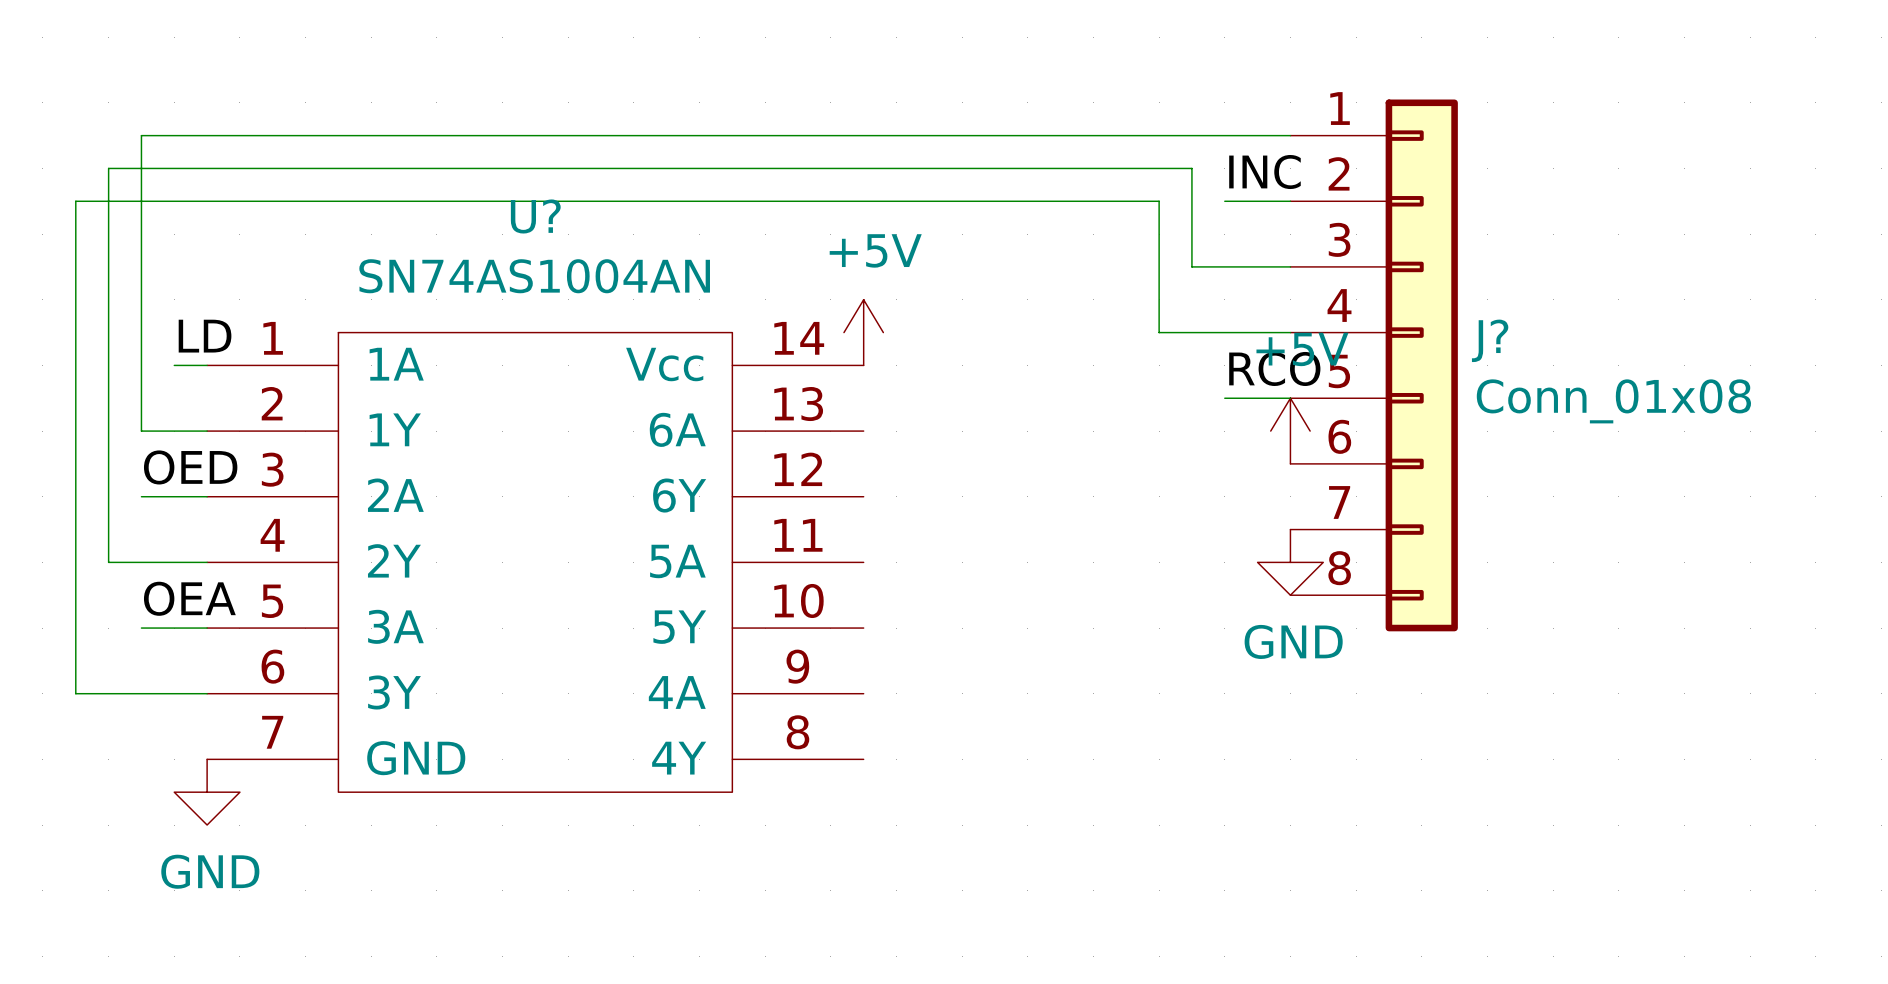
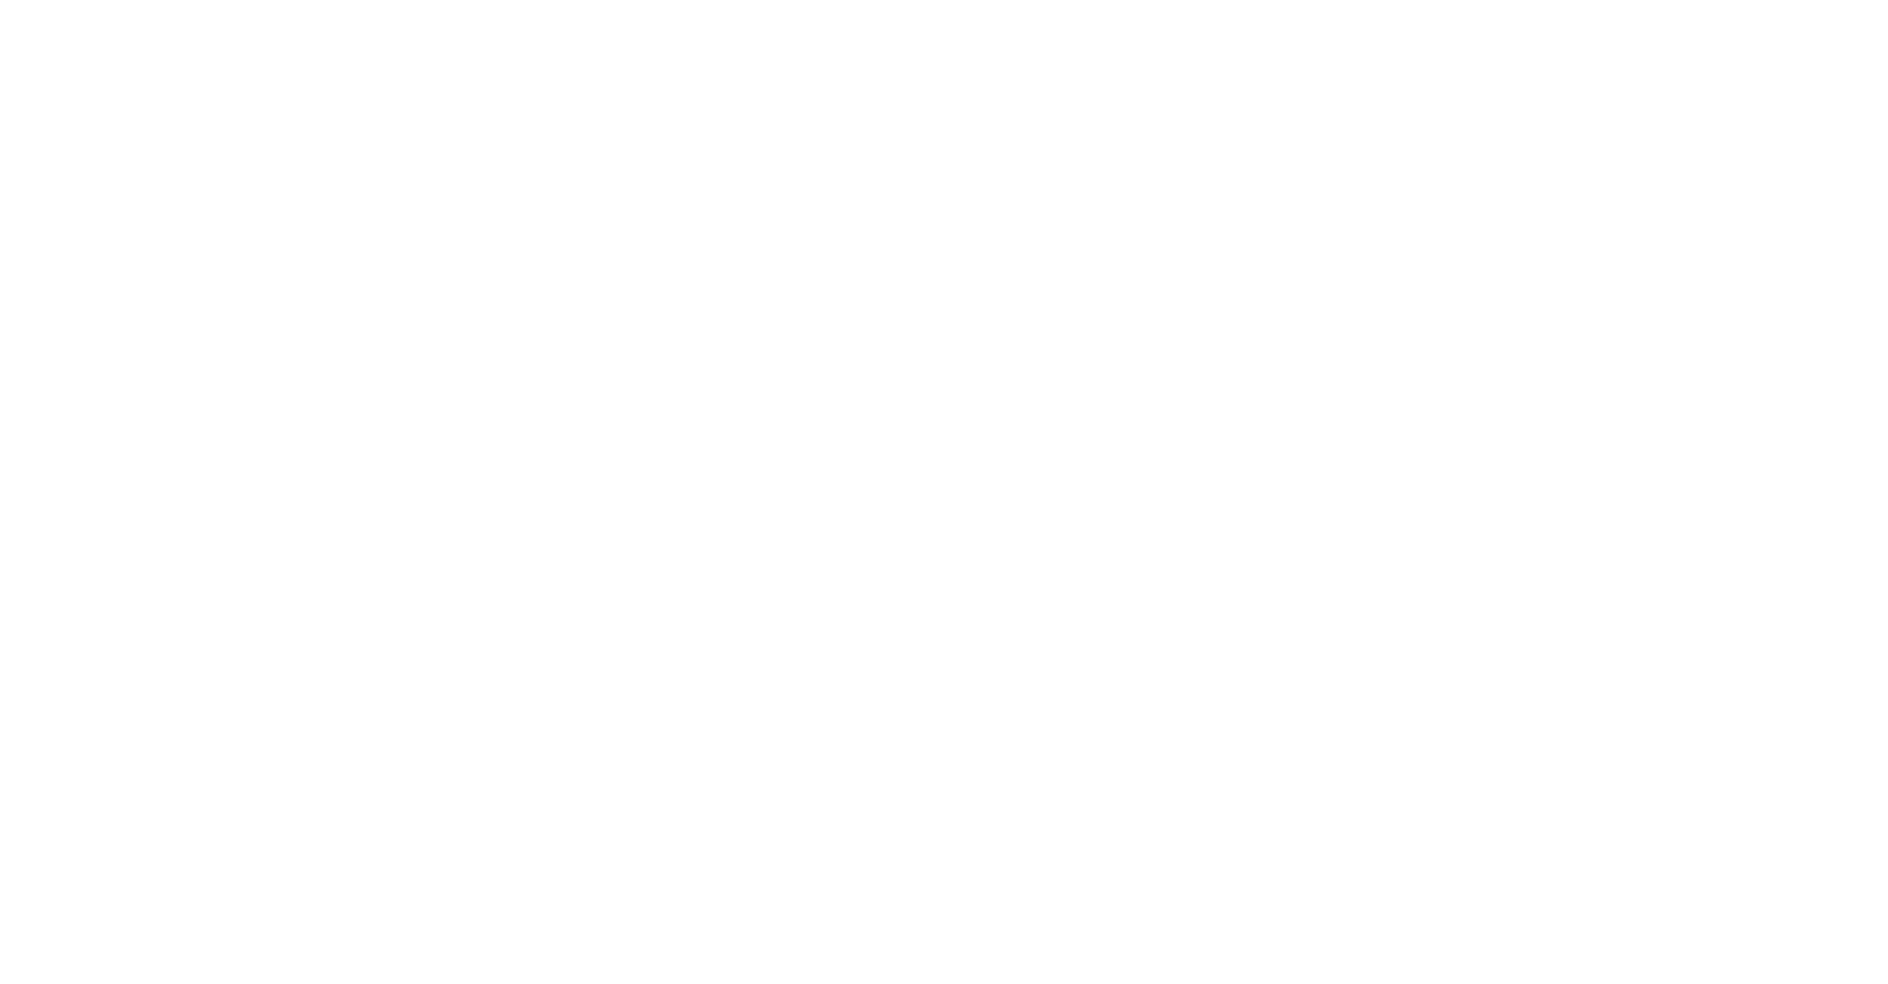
wire: (1290, 135) (141, 135) (141, 431) (207, 431) -> none
label: INC (1264, 172) -> none
wire: (1224, 201) (1290, 201) -> none
wire: (1290, 266) (1191, 266) (1191, 168) (108, 168) (108, 562) (207, 562) -> none
power symbol: +5V (863, 332) -> none
wire: (1290, 332) (1159, 332) (1159, 201) (75, 201) (75, 693) (207, 693) -> none
label: LD (205, 336) -> none
wire: (174, 365) (207, 365) -> none
J?: Conn_01x08 (1374, 365) -> none
label: RCO (1274, 368) -> none
wire: (1224, 398) (1290, 398) -> none
power symbol: +5V (1290, 431) -> none
label: OED (190, 467) -> none
wire: (141, 496) (207, 496) -> none
U?: SN74AS1004AN (535, 562) -> none
power symbol: GND (1290, 562) -> none
label: OEA (189, 598) -> none
wire: (141, 628) (207, 628) -> none
power symbol: GND (207, 792) -> none

